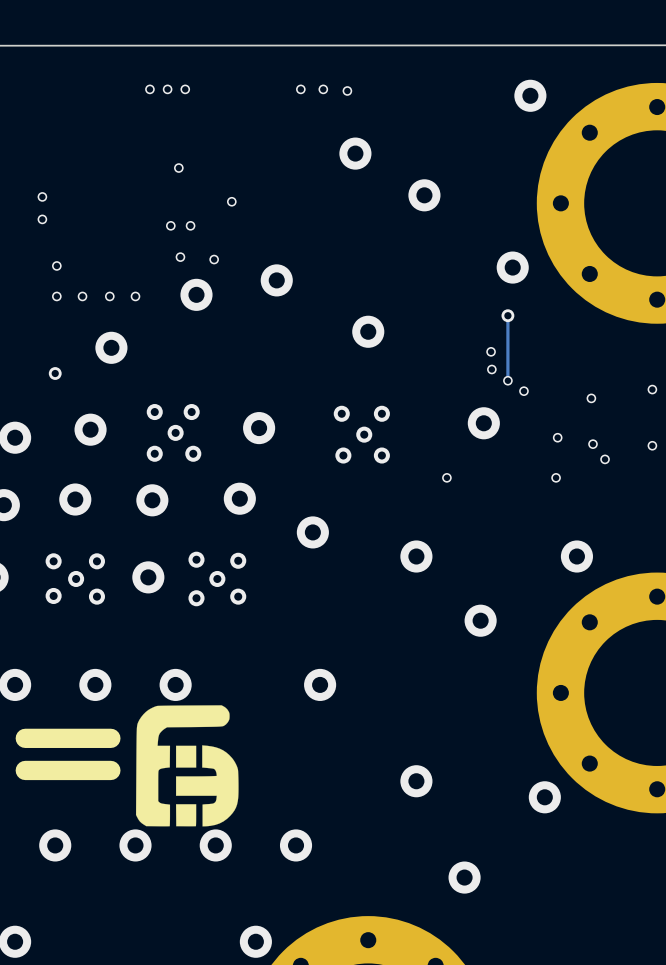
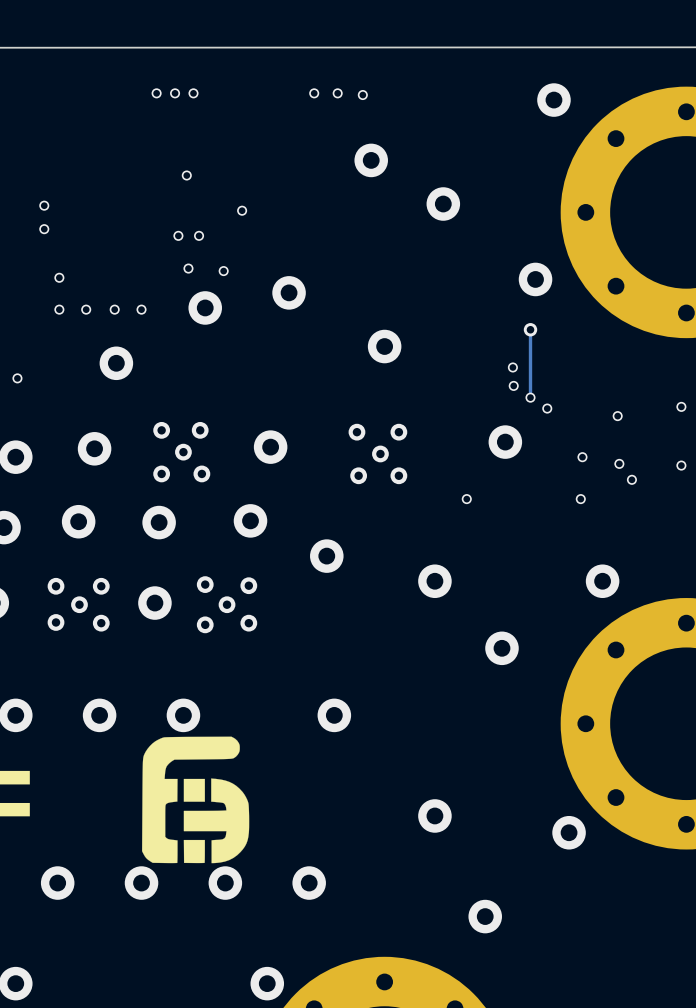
via: none -> (17, 378)
via: (55, 373) -> none

